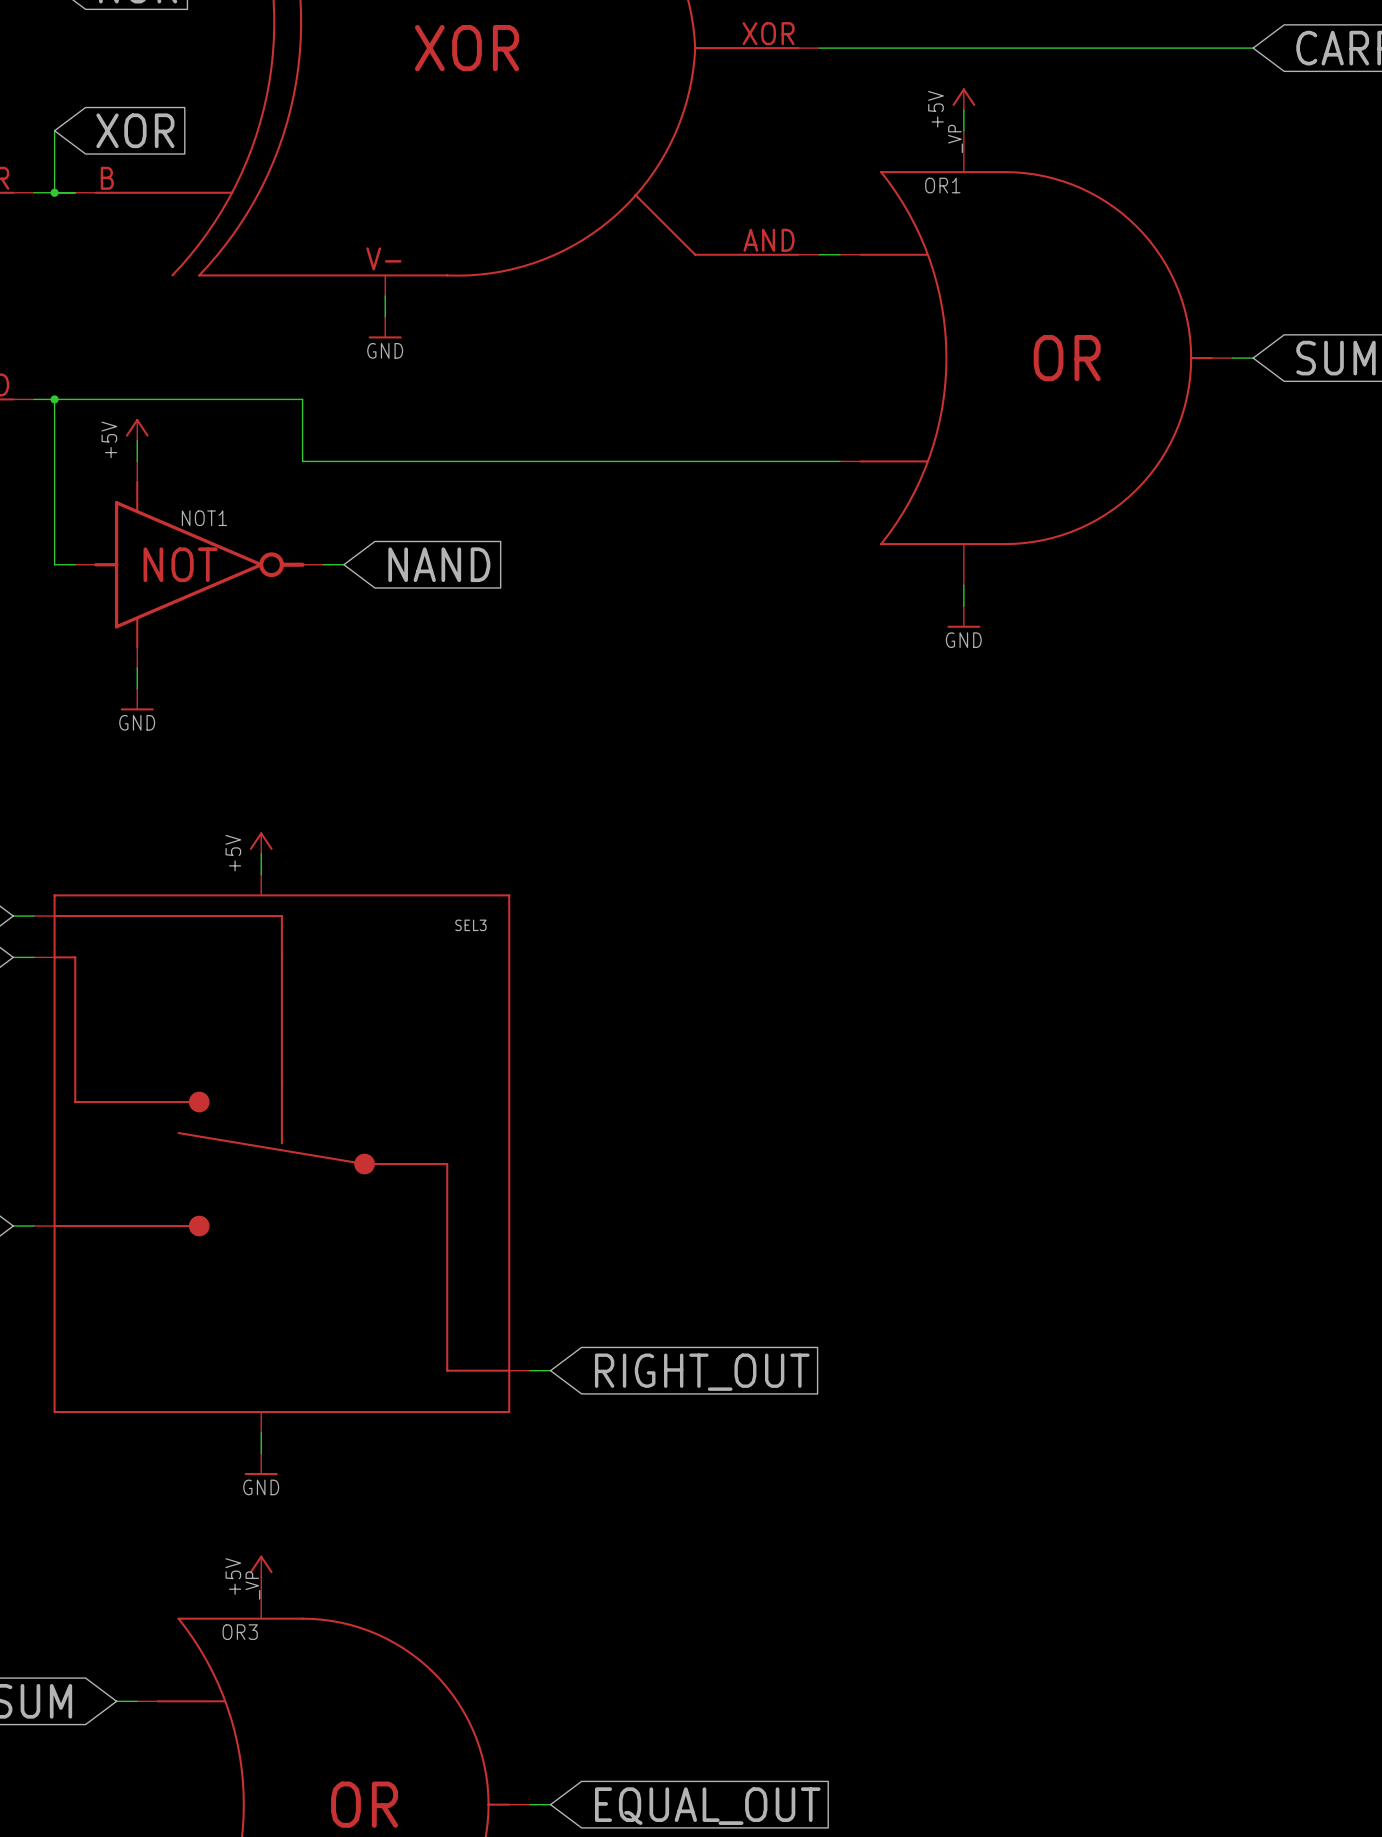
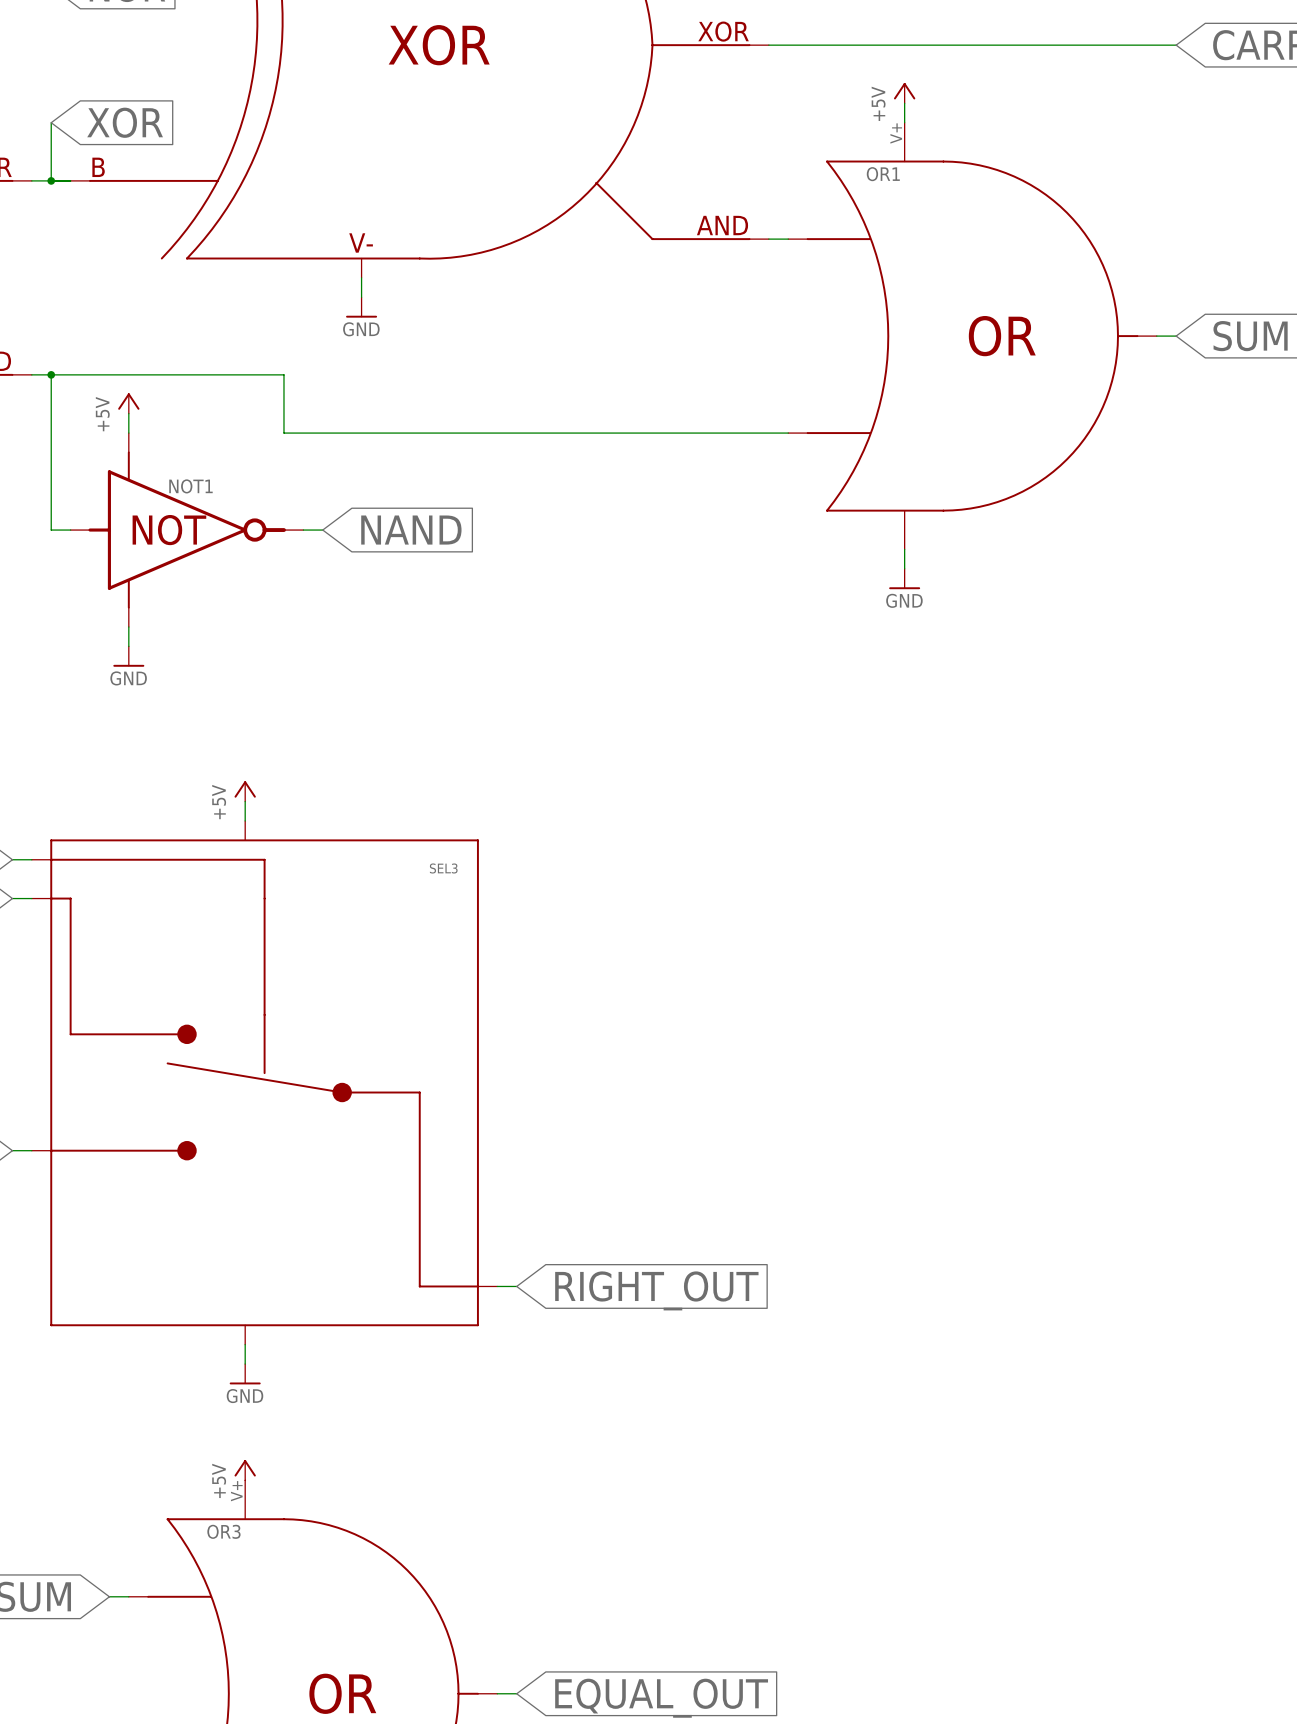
OR1 pin number: _VP (955, 138) -> V+ (896, 133)
OR3 pin number: _VP (252, 1585) -> V+ (236, 1491)

